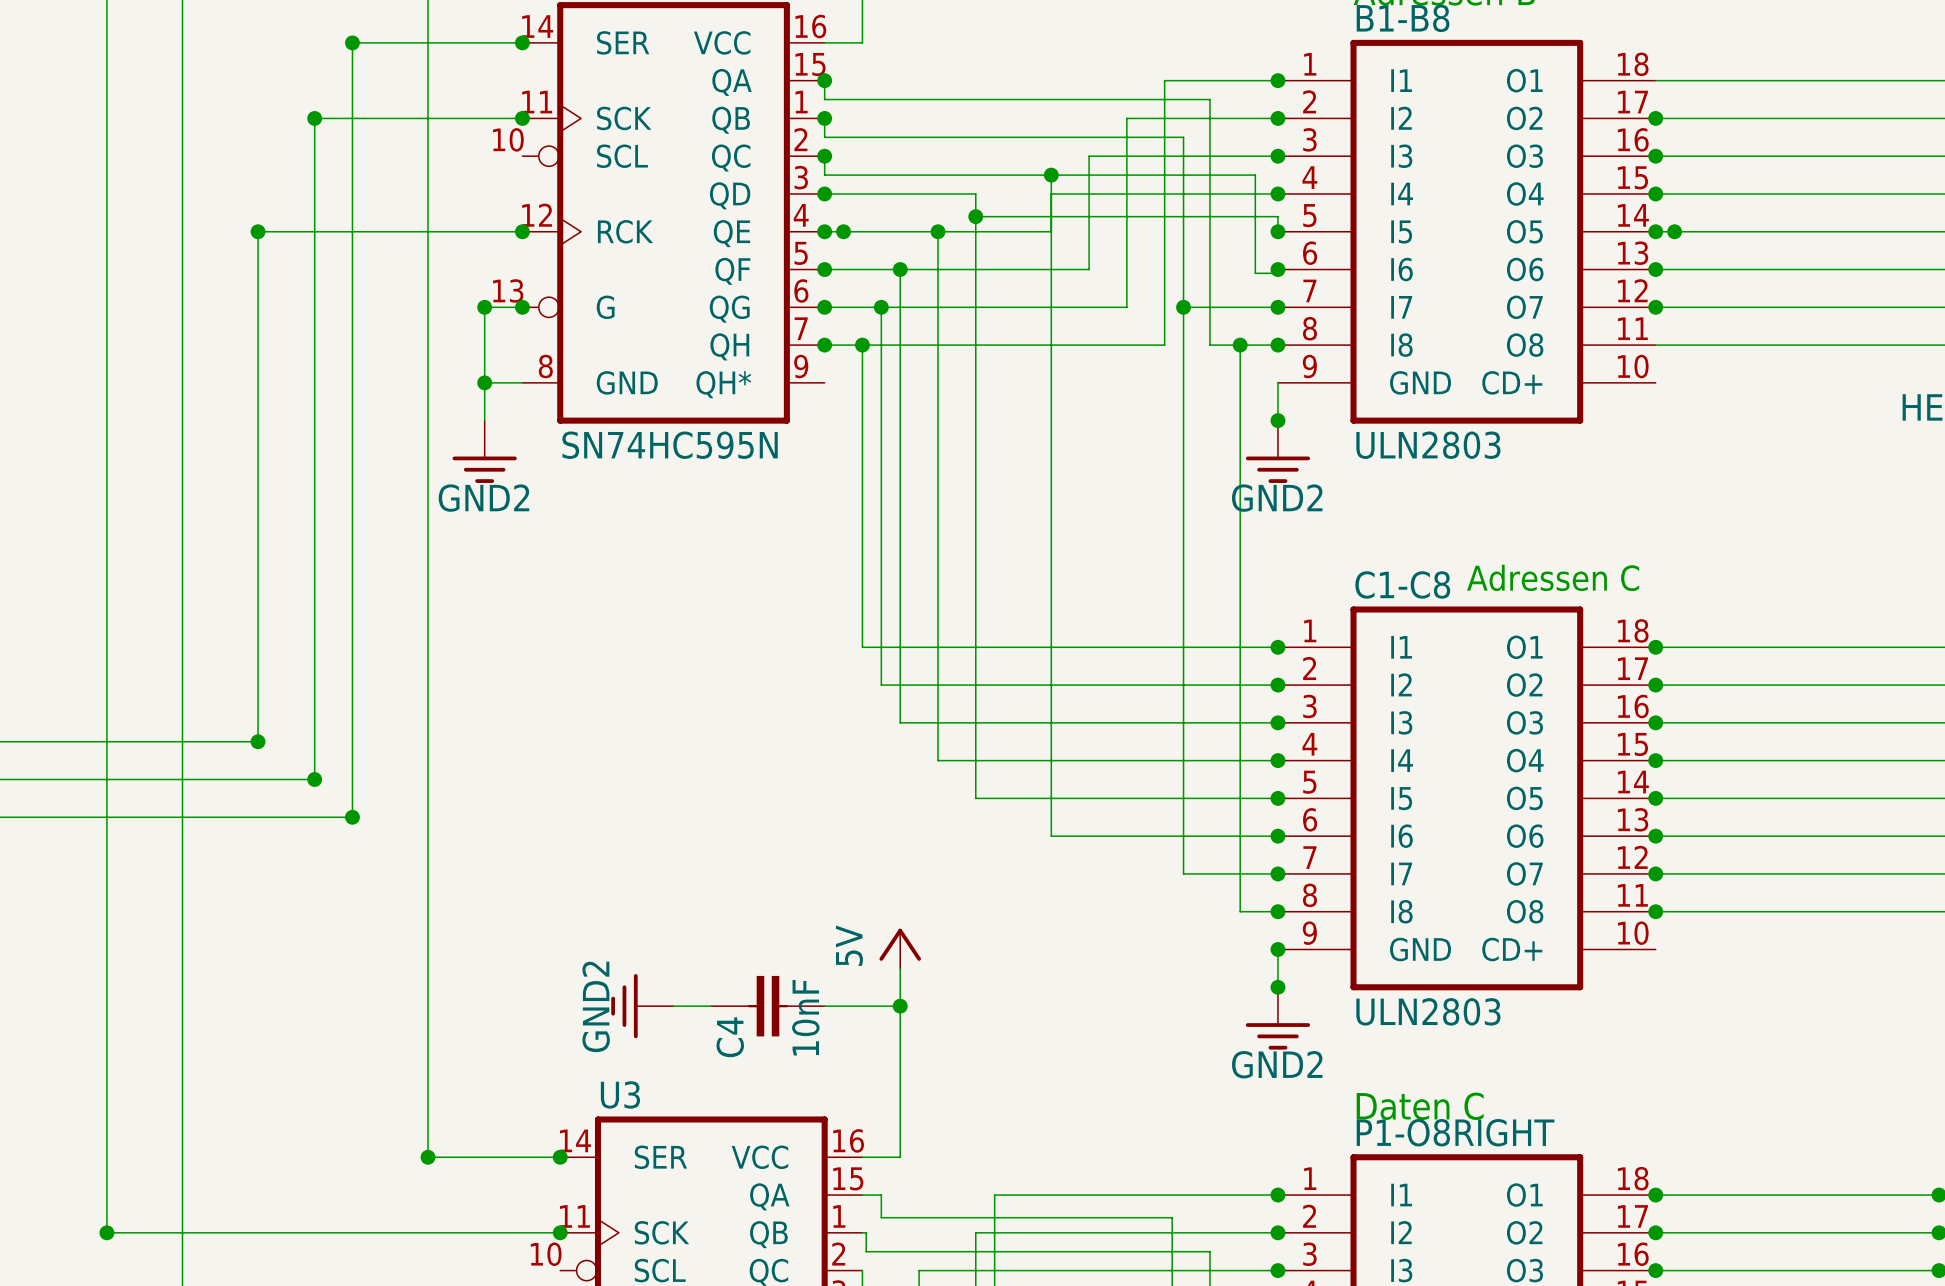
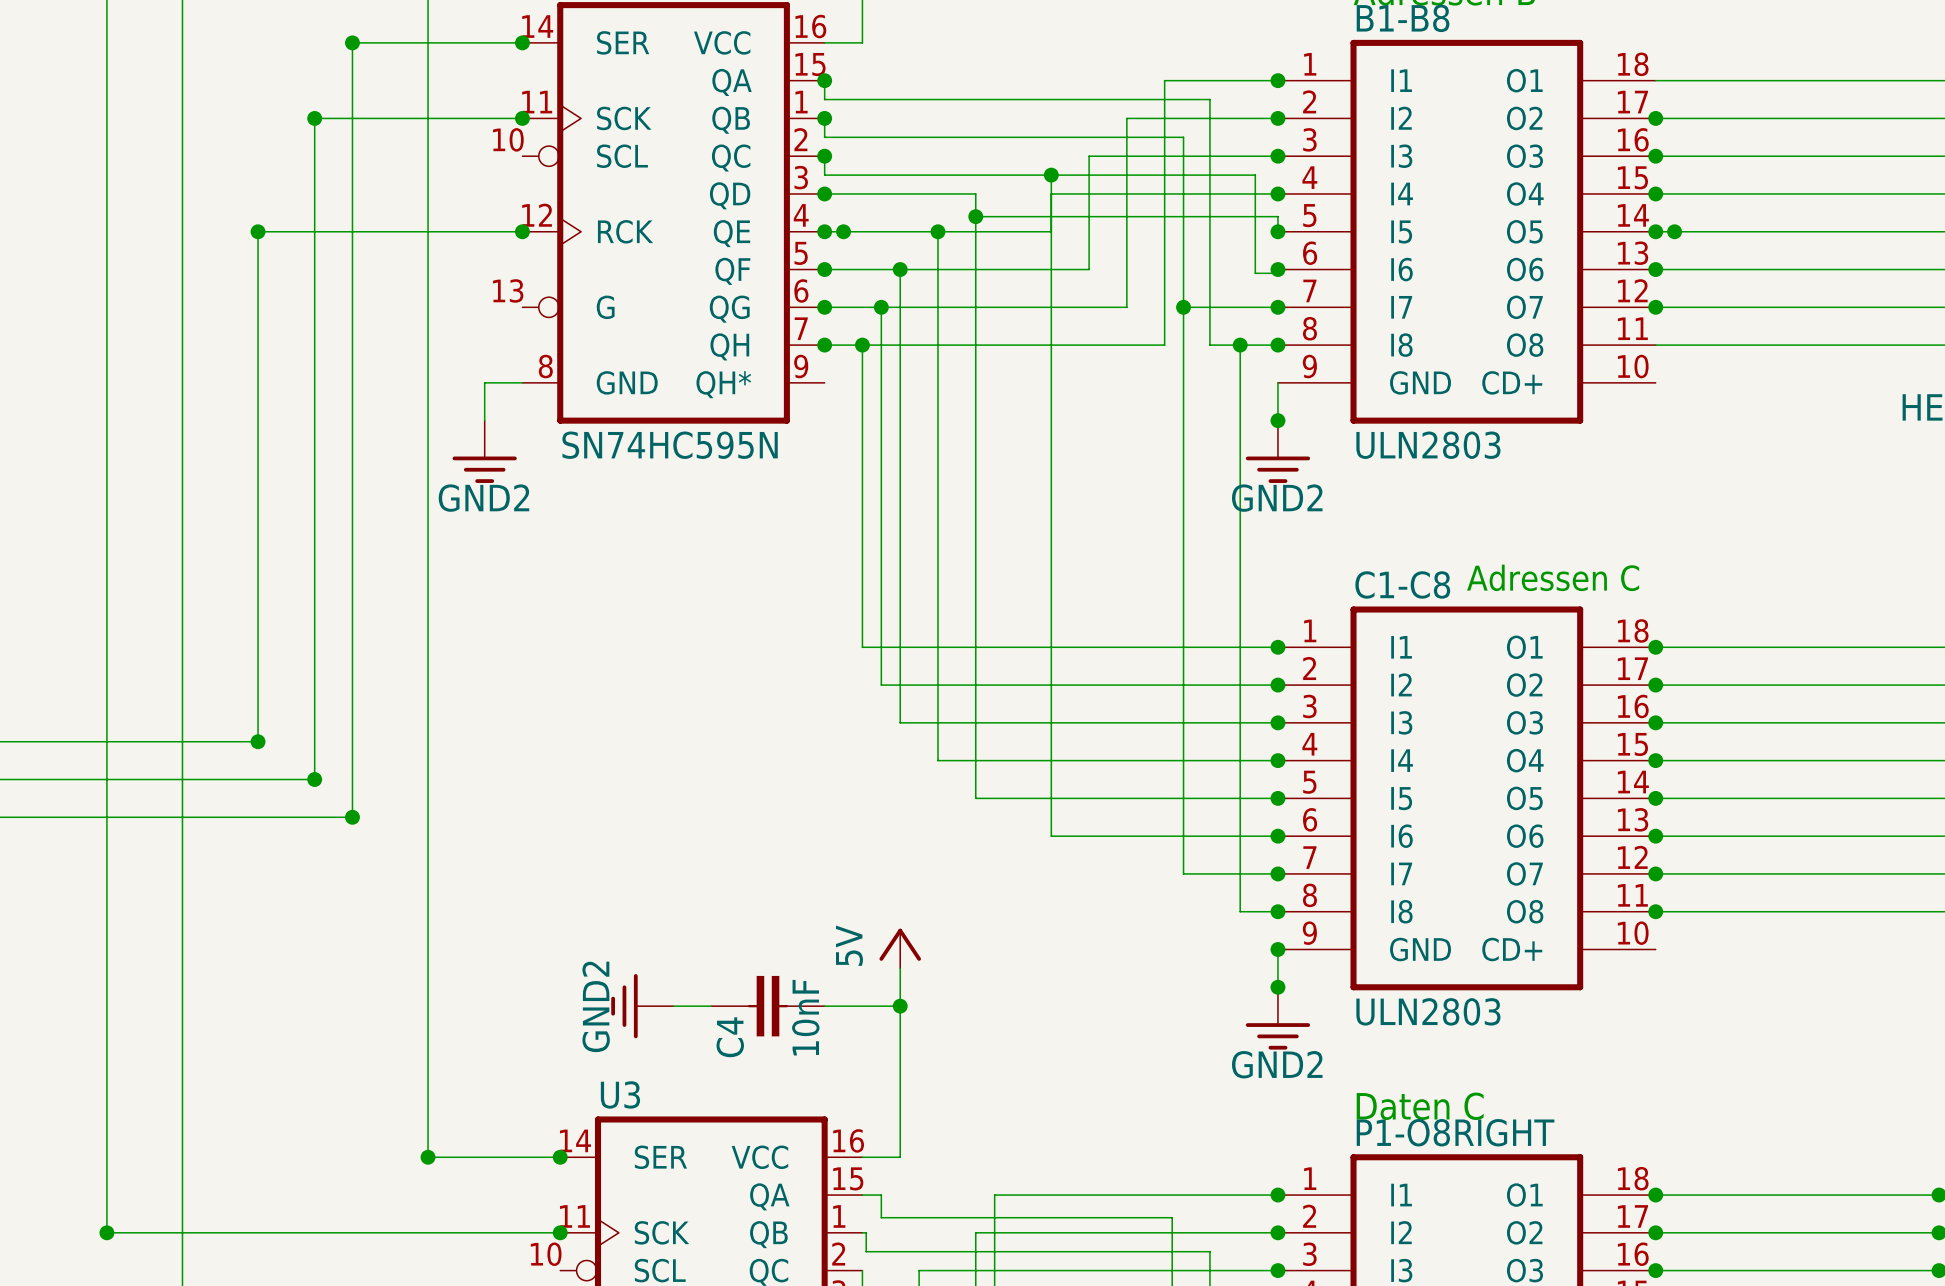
junction: (484, 307) -> none
wire: (522, 307) (484, 307) (484, 382) -> none
junction: (522, 307) -> none
junction: (484, 382) -> none

